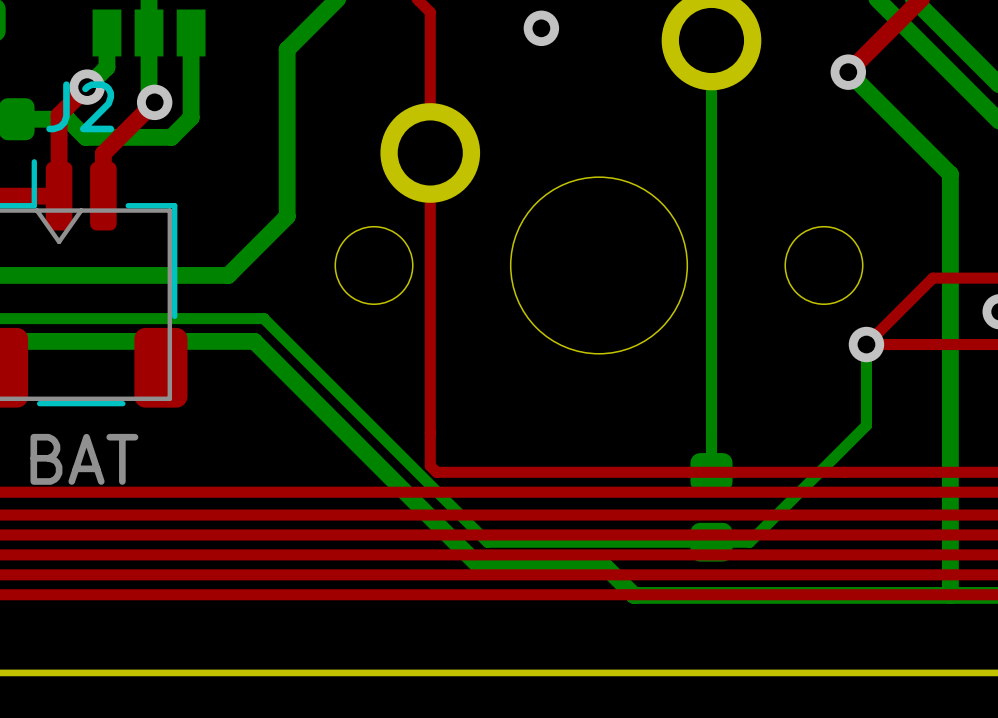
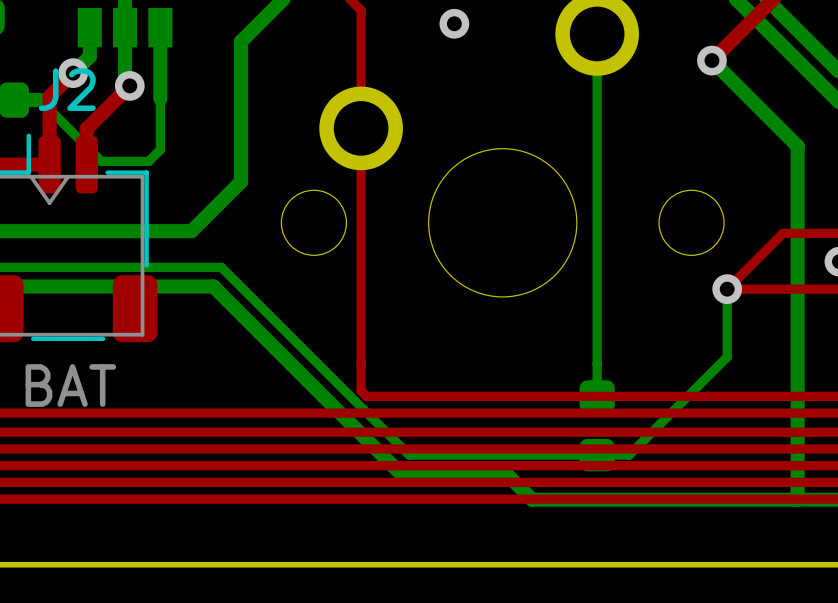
bottom track: (191, 117) (171, 137) (85, 137) (67, 119) (47, 119) -> (160, 98) (160, 149) (148, 161) (101, 161) (40, 100)

